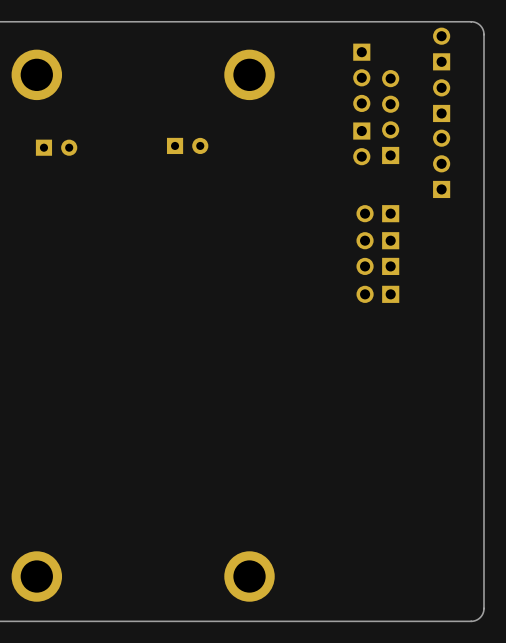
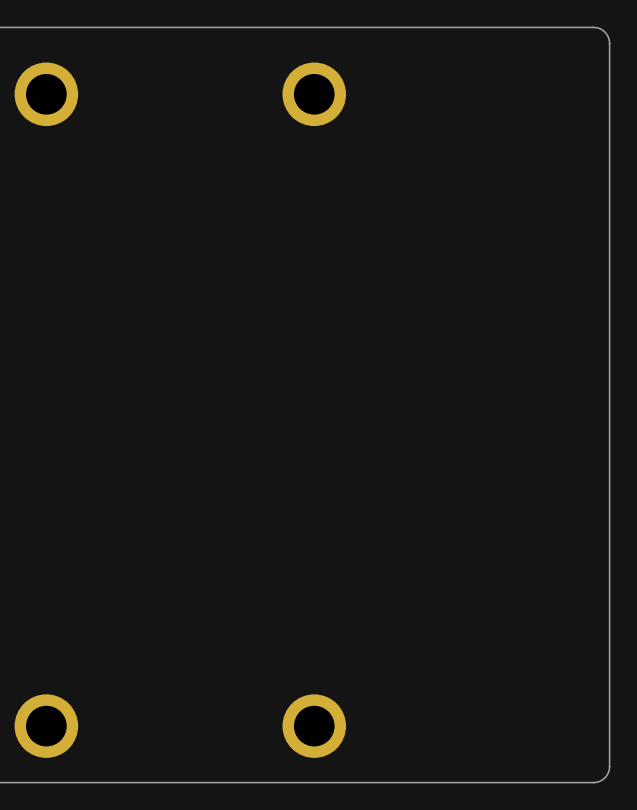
part: (441, 49) -> none
part: (361, 77) -> none
part: (441, 100) -> none
part: (390, 117) -> none
part: (361, 143) -> none
part: (187, 145) -> none
part: (56, 147) -> none
part: (441, 163) -> none
part: (377, 213) -> none
part: (377, 240) -> none
part: (377, 266) -> none
part: (377, 294) -> none

